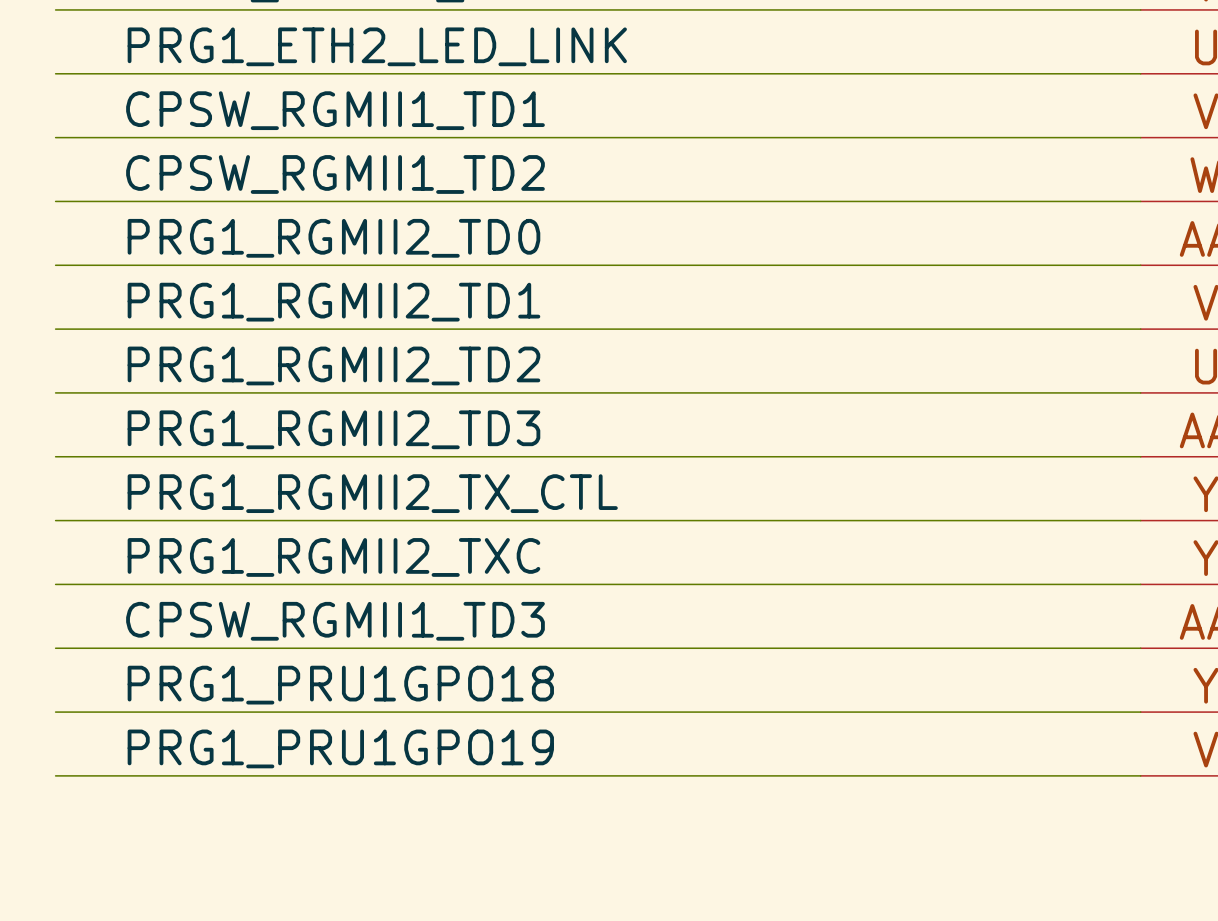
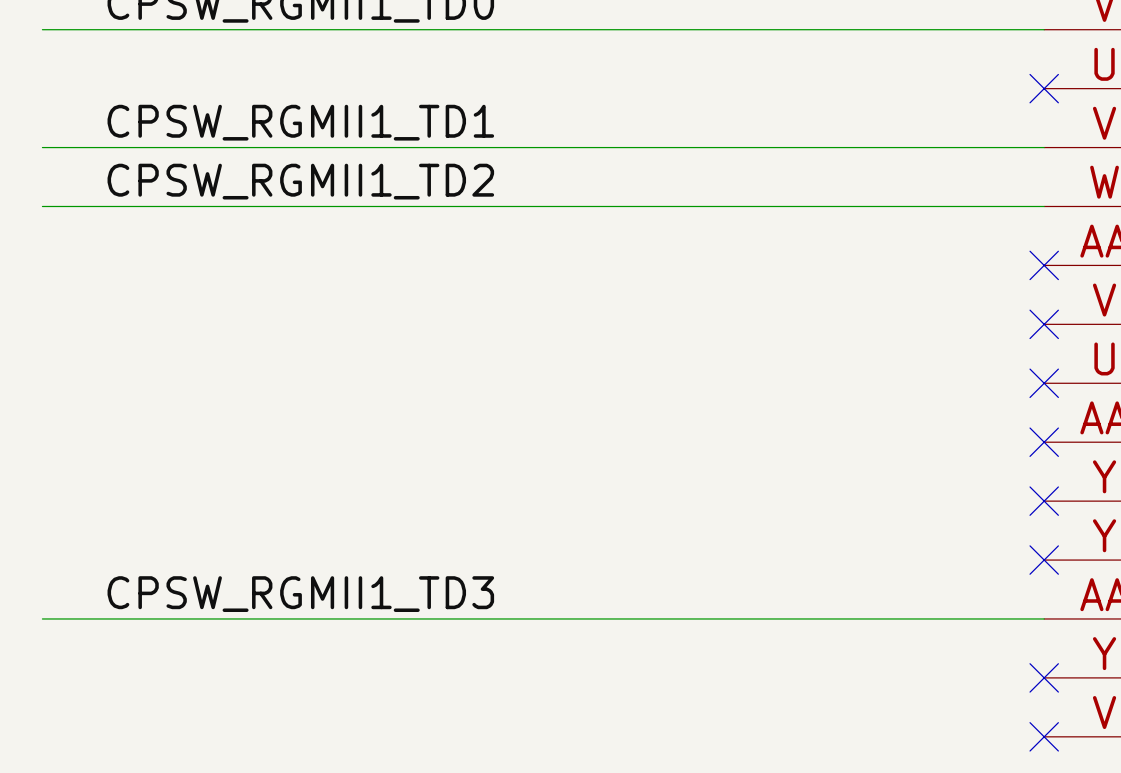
label: PRG1_ETH2_LED_LINK (377, 46) -> none
wire: (55, 73) (1140, 73) -> none
no-connect mark: none -> (1044, 88)
label: PRG1_RGMII2_TD0 (333, 238) -> none
wire: (55, 265) (1140, 265) -> none
no-connect mark: none -> (1044, 265)
label: PRG1_RGMII2_TD1 (333, 302) -> none
wire: (55, 329) (1140, 329) -> none
no-connect mark: none -> (1044, 324)
label: PRG1_RGMII2_TD2 (333, 365) -> none
wire: (55, 392) (1140, 392) -> none
no-connect mark: none -> (1044, 383)
label: PRG1_RGMII2_TD3 (333, 429) -> none
wire: (55, 456) (1140, 456) -> none
no-connect mark: none -> (1044, 442)
label: PRG1_RGMII2_TX_CTL (372, 493) -> none
wire: (55, 520) (1140, 520) -> none
no-connect mark: none -> (1044, 501)
label: PRG1_RGMII2_TXC (333, 557) -> none
wire: (55, 584) (1140, 584) -> none
no-connect mark: none -> (1044, 560)
label: PRG1_PRU1GPO18 (340, 685) -> none
wire: (55, 712) (1140, 712) -> none
no-connect mark: none -> (1044, 677)
label: PRG1_PRU1GPO19 (340, 748) -> none
wire: (55, 775) (1140, 775) -> none
no-connect mark: none -> (1044, 736)

